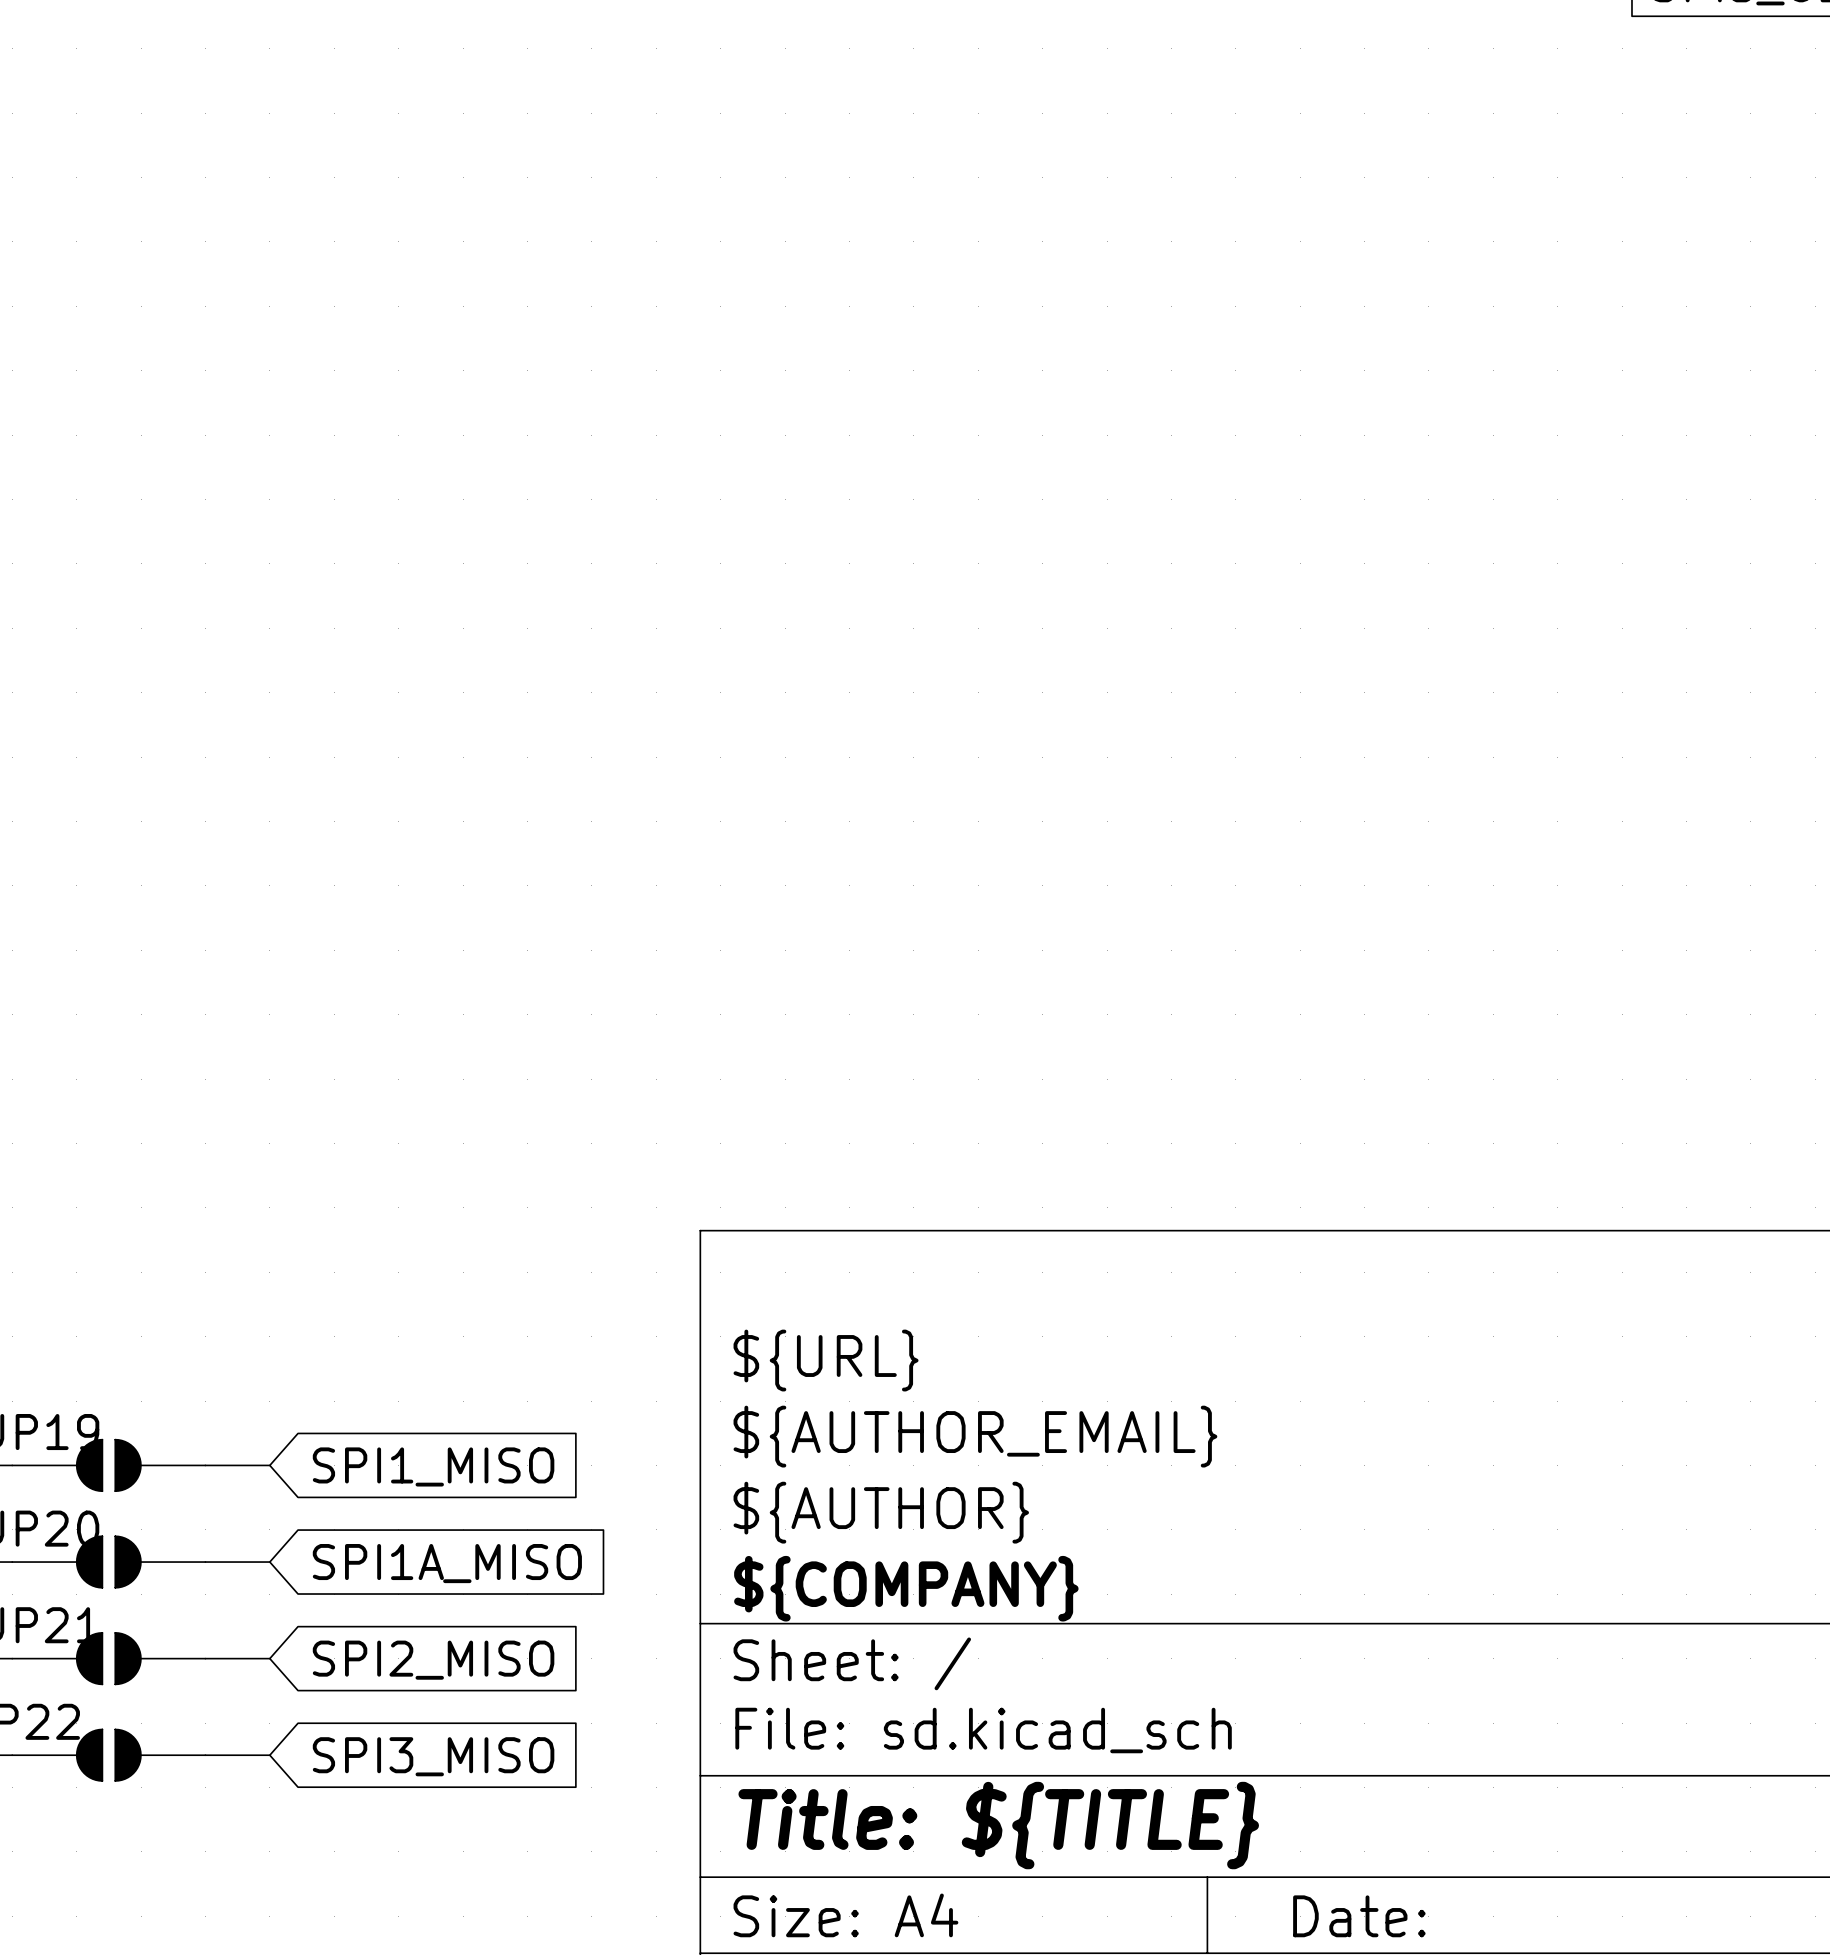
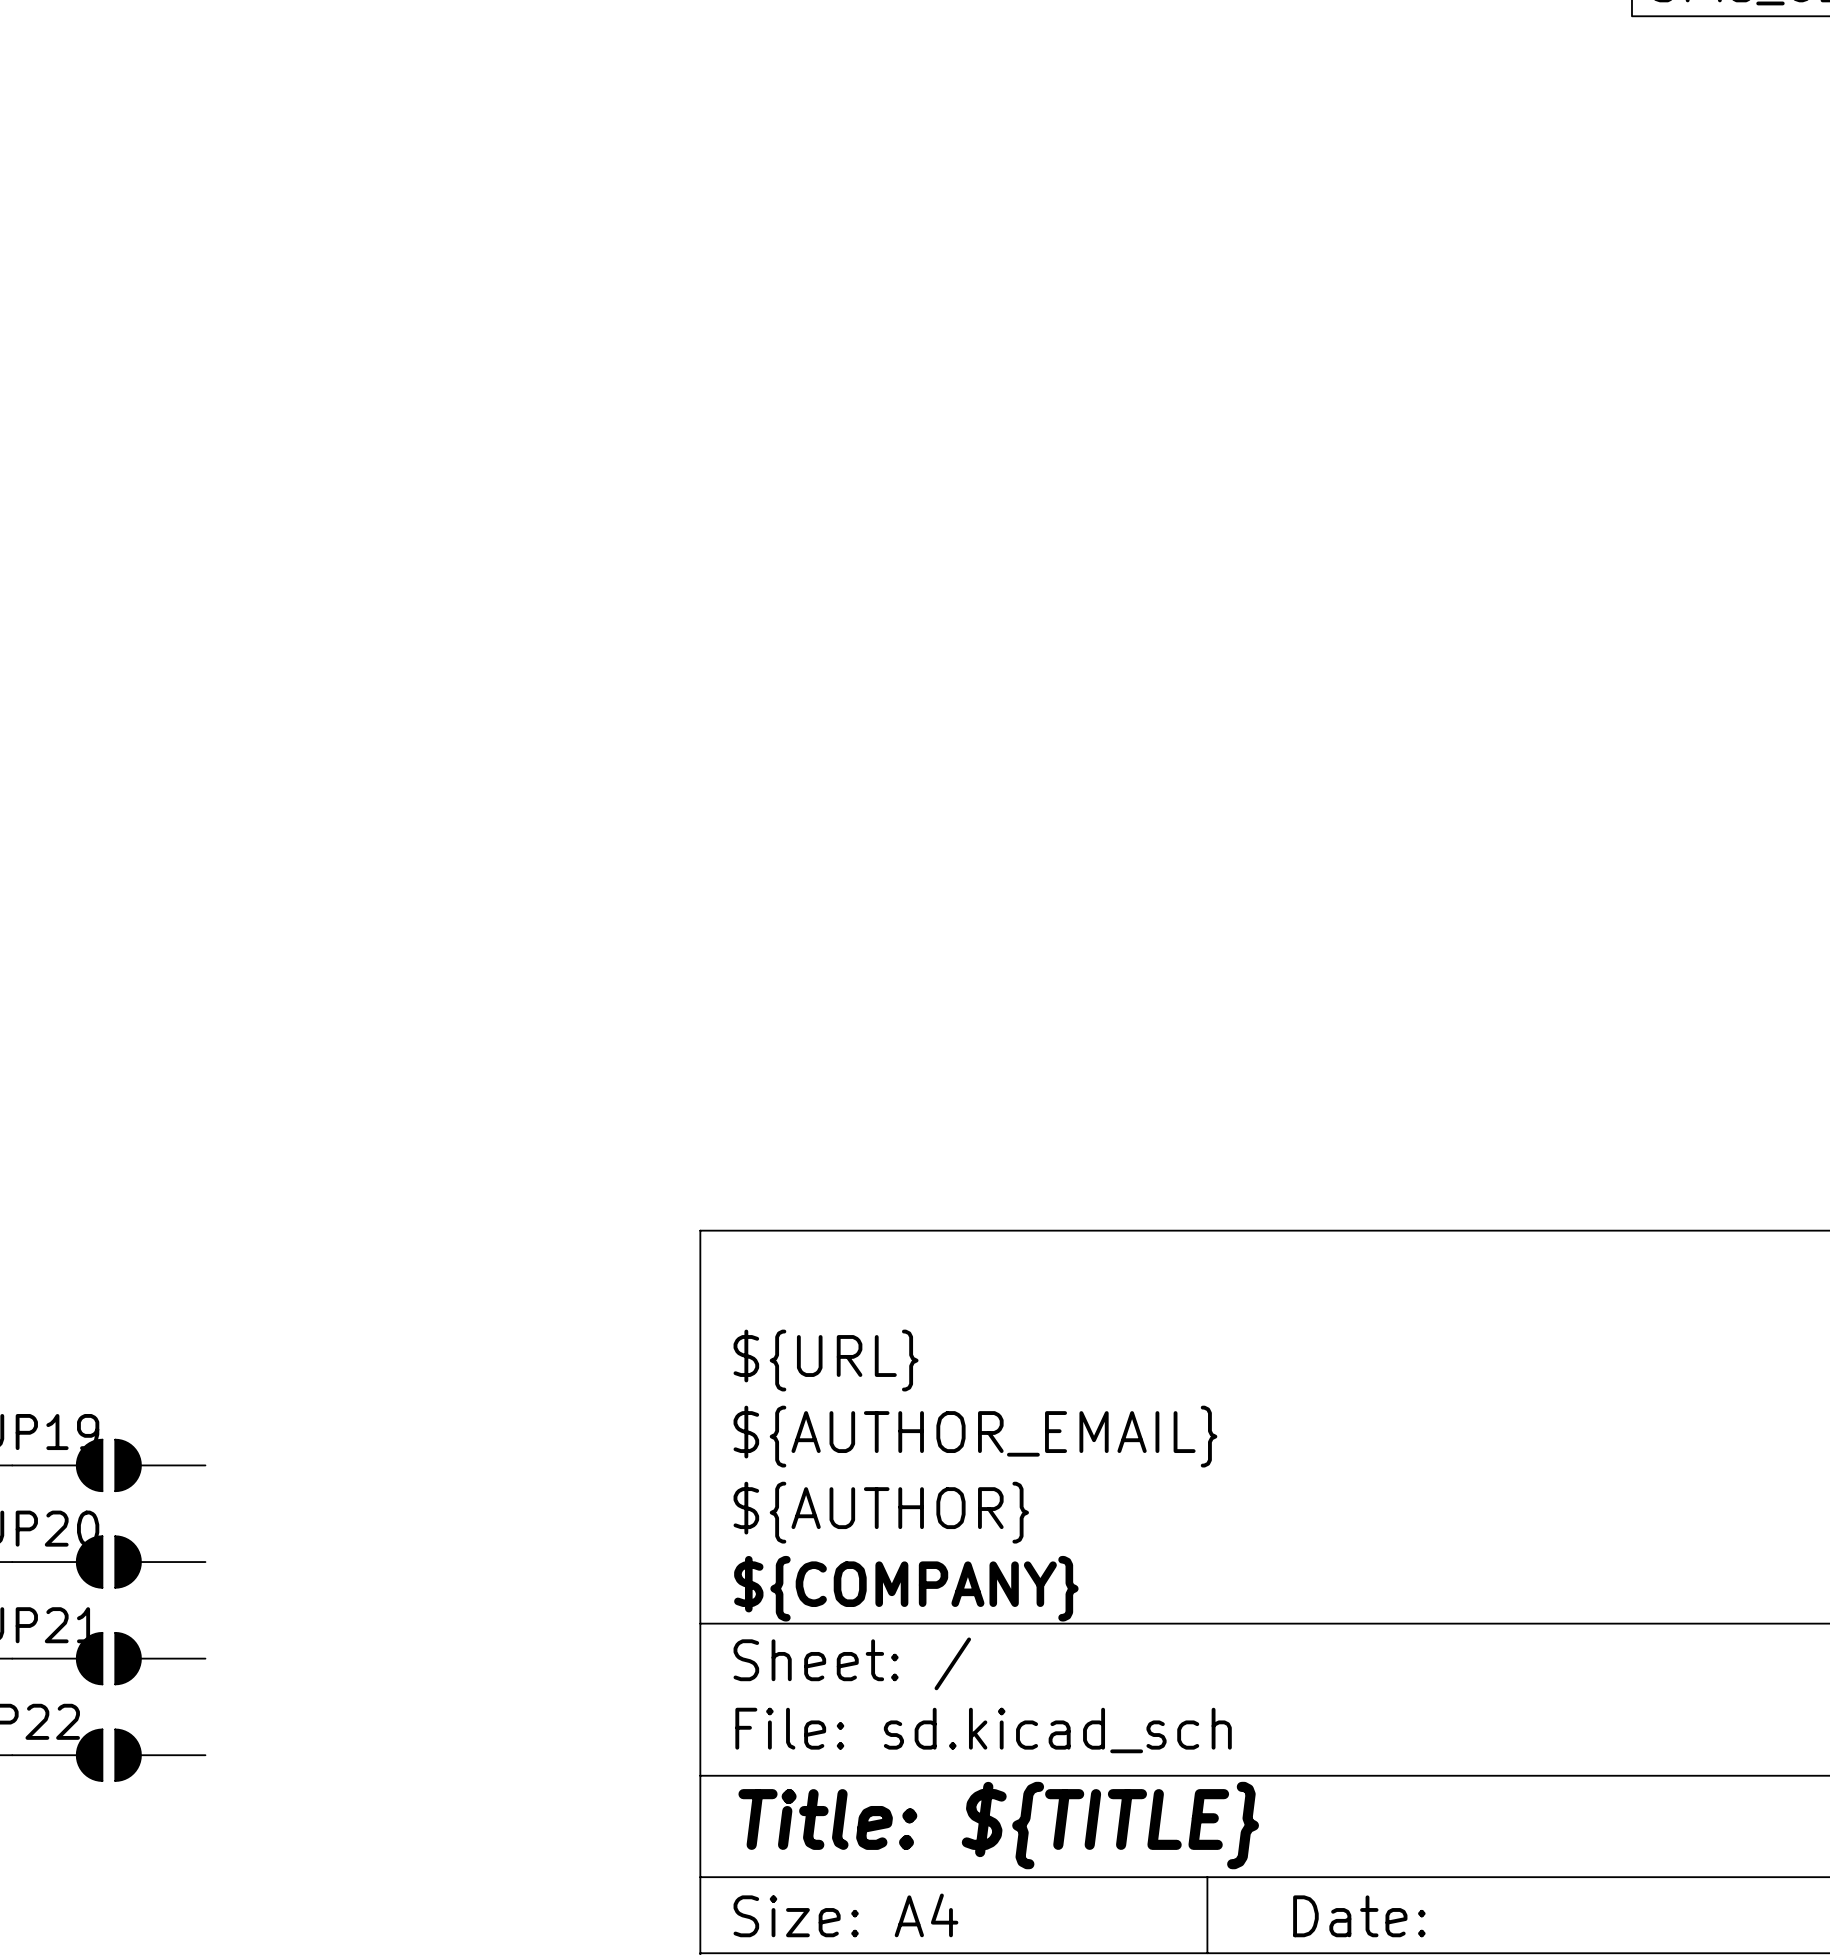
wire: (205, 1465) (269, 1465) -> none
global label: SPI1_MISO (433, 1466) -> none
wire: (205, 1562) (269, 1562) -> none
global label: SPI1A_MISO (447, 1563) -> none
wire: (205, 1658) (269, 1658) -> none
global label: SPI2_MISO (433, 1660) -> none
wire: (205, 1755) (269, 1755) -> none
global label: SPI3_MISO (433, 1756) -> none

